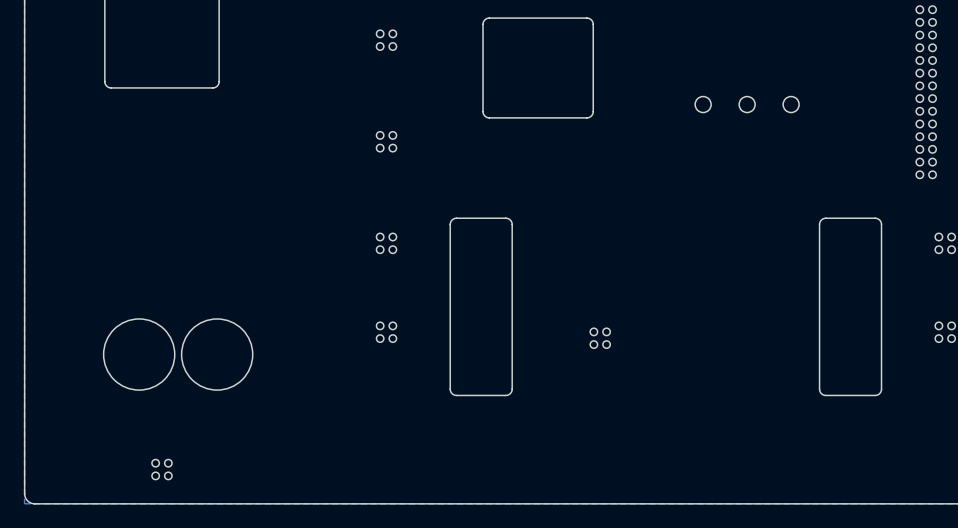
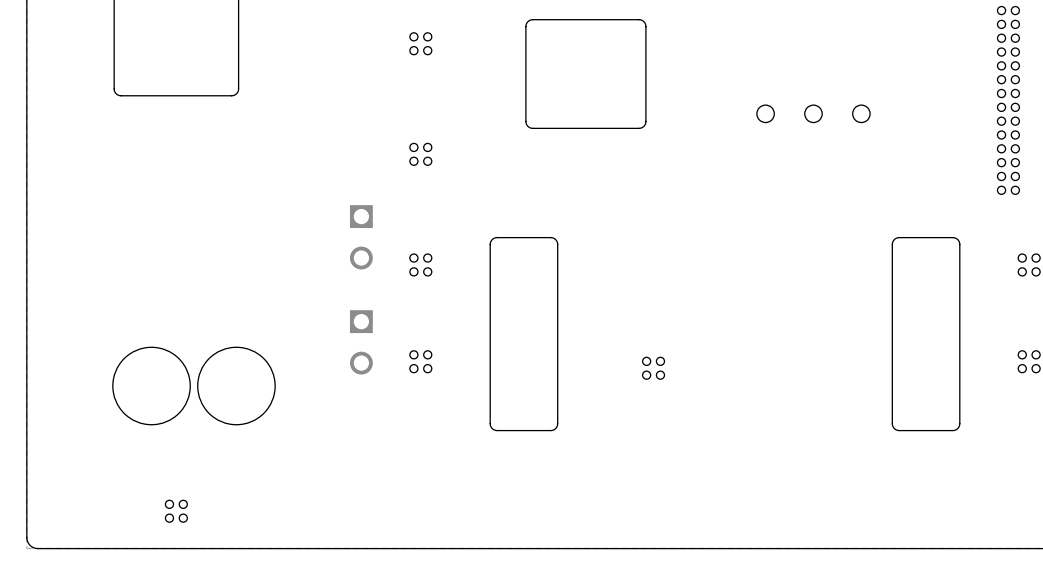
part: none -> (361, 237)
part: none -> (361, 342)

